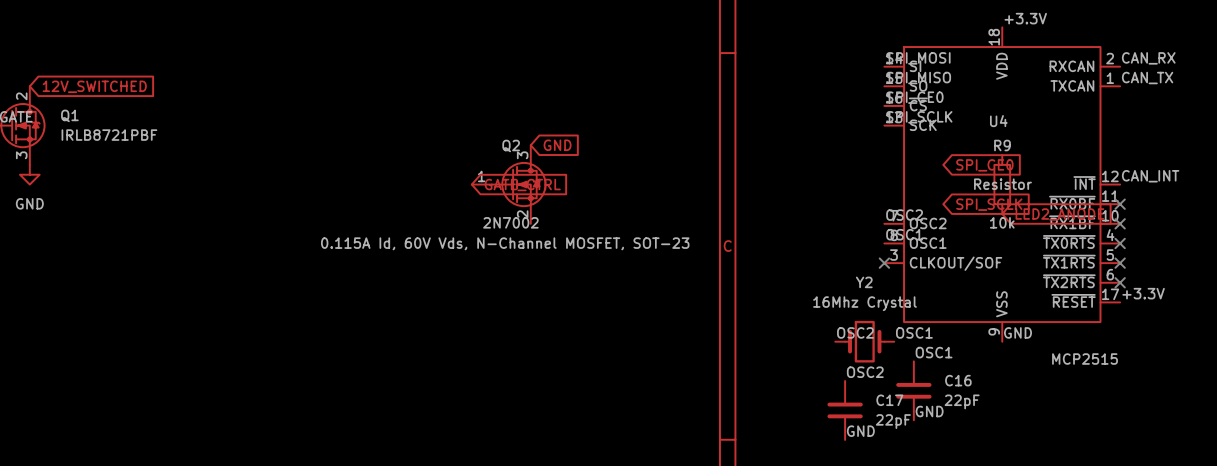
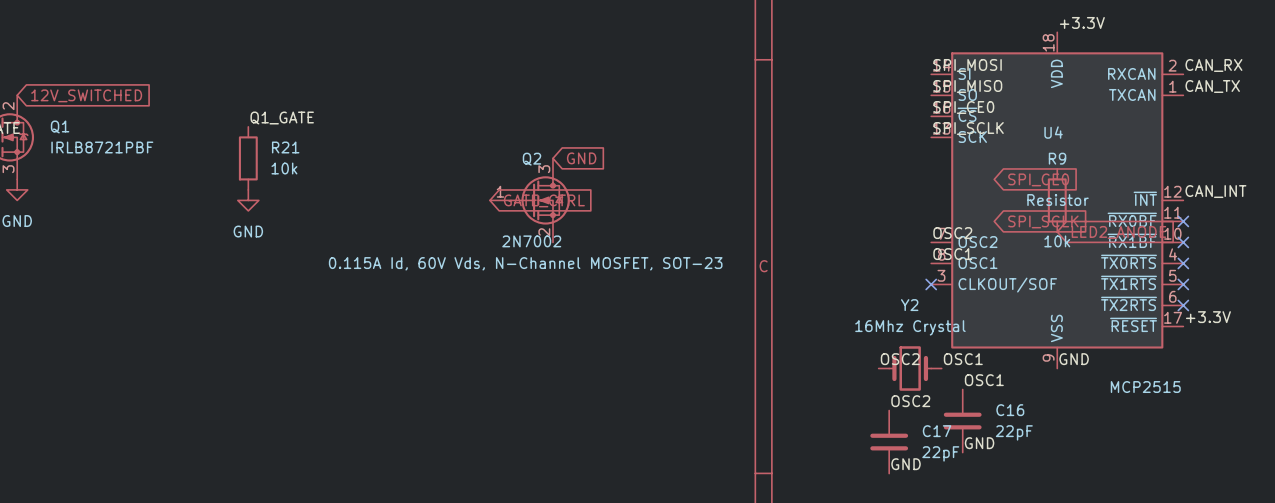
label: none -> Q1_GATE (282, 118)
R21: none -> 10k (248, 158)
power symbol: none -> GND (248, 200)

